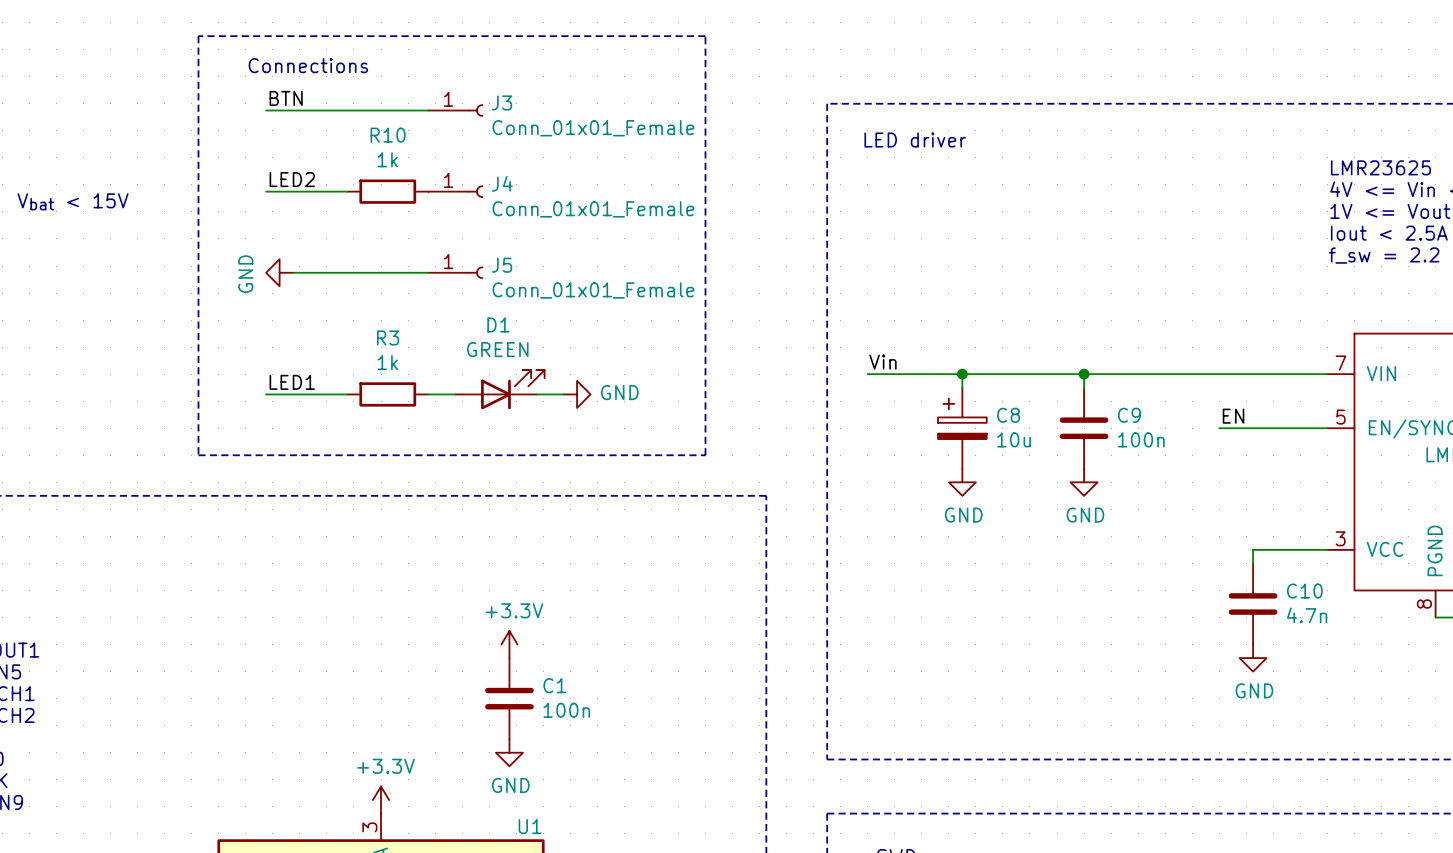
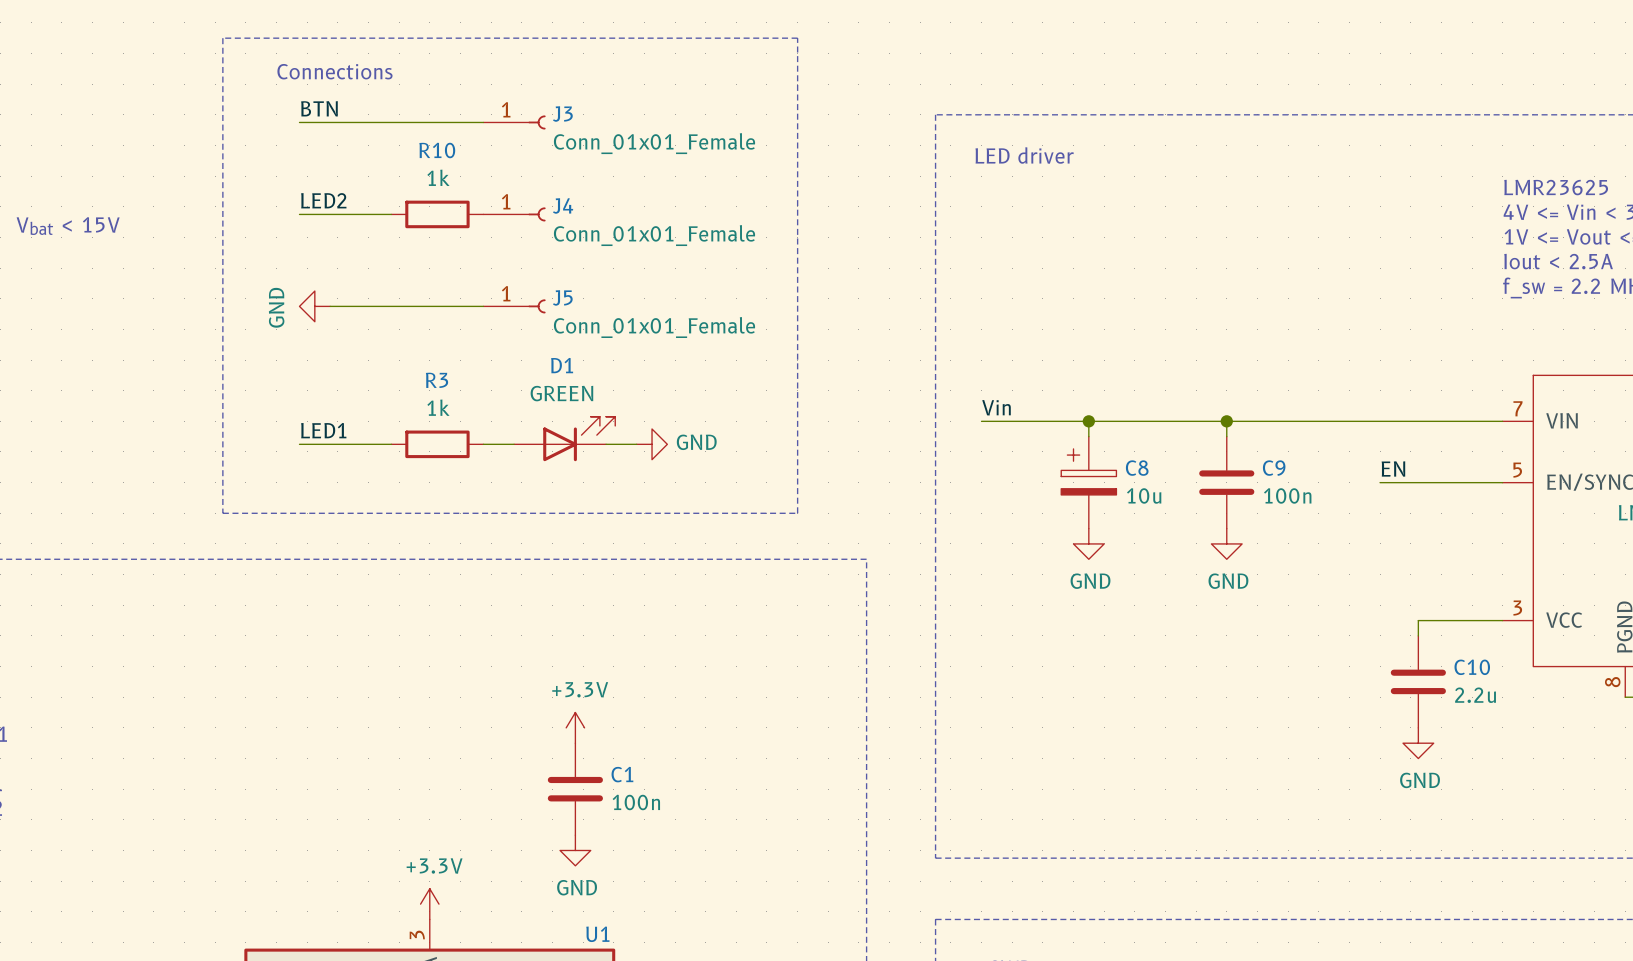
C10 value: 4.7n (1307, 615) -> 2.2u (1475, 695)

